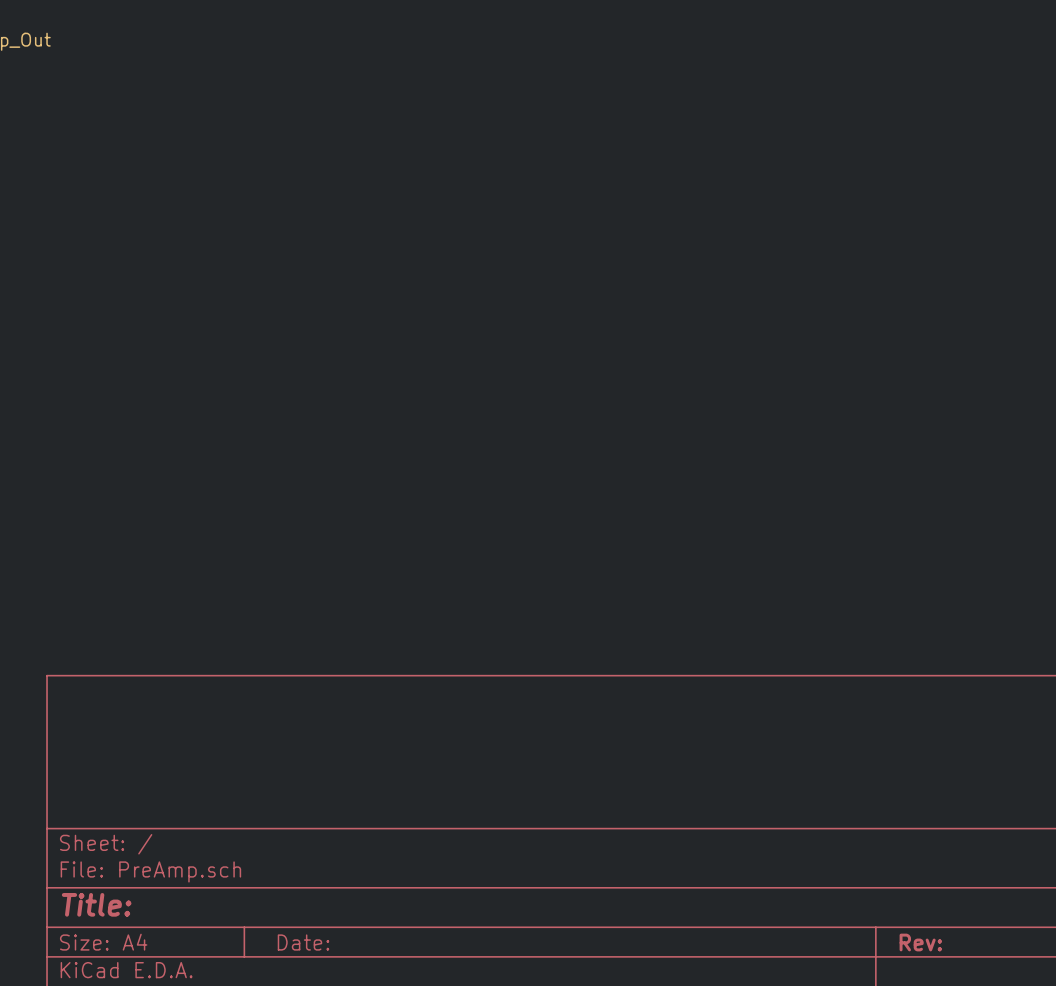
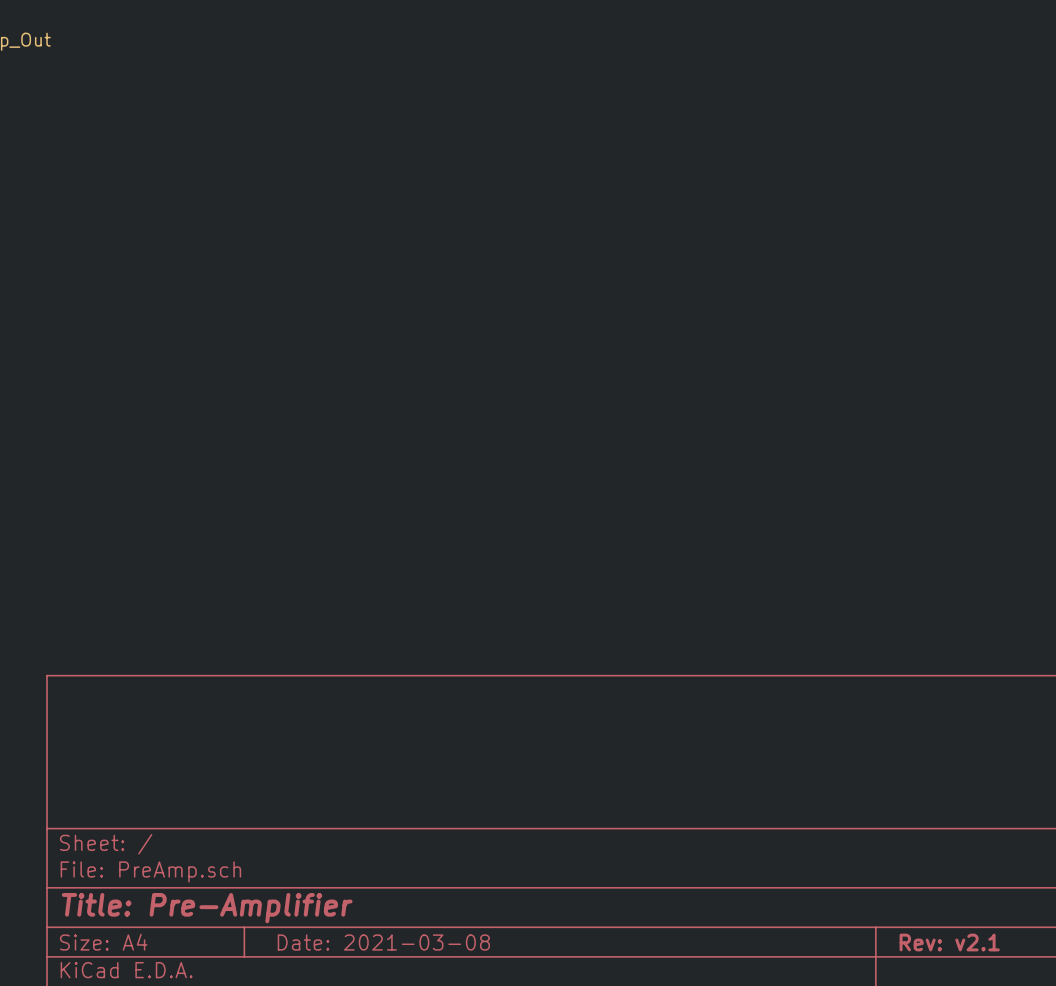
title block: Title: (96, 904) -> Title: Pre-Amplifier (207, 908)
title block: Date: (303, 942) -> Date: 2021-03-08 (383, 942)
title block: Rev: (920, 942) -> Rev: v2.1 (949, 942)

